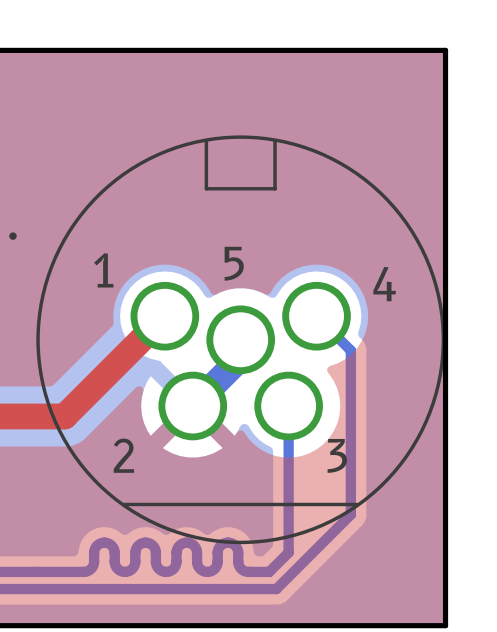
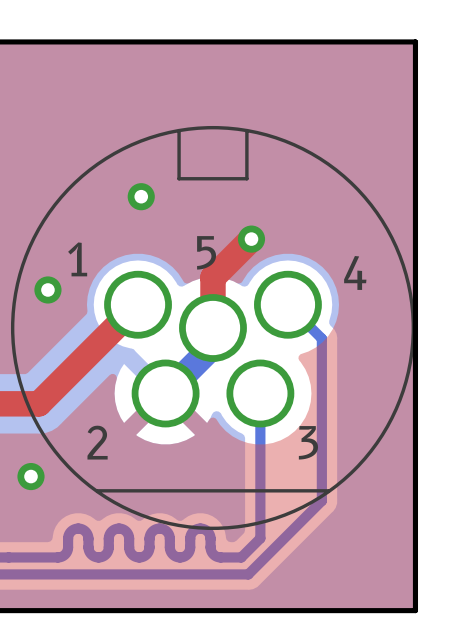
via: none -> (141, 196)
top track: none -> (251, 239) (212, 277) (212, 328)
via: none -> (251, 239)
via: none -> (47, 289)
via: none -> (30, 476)

